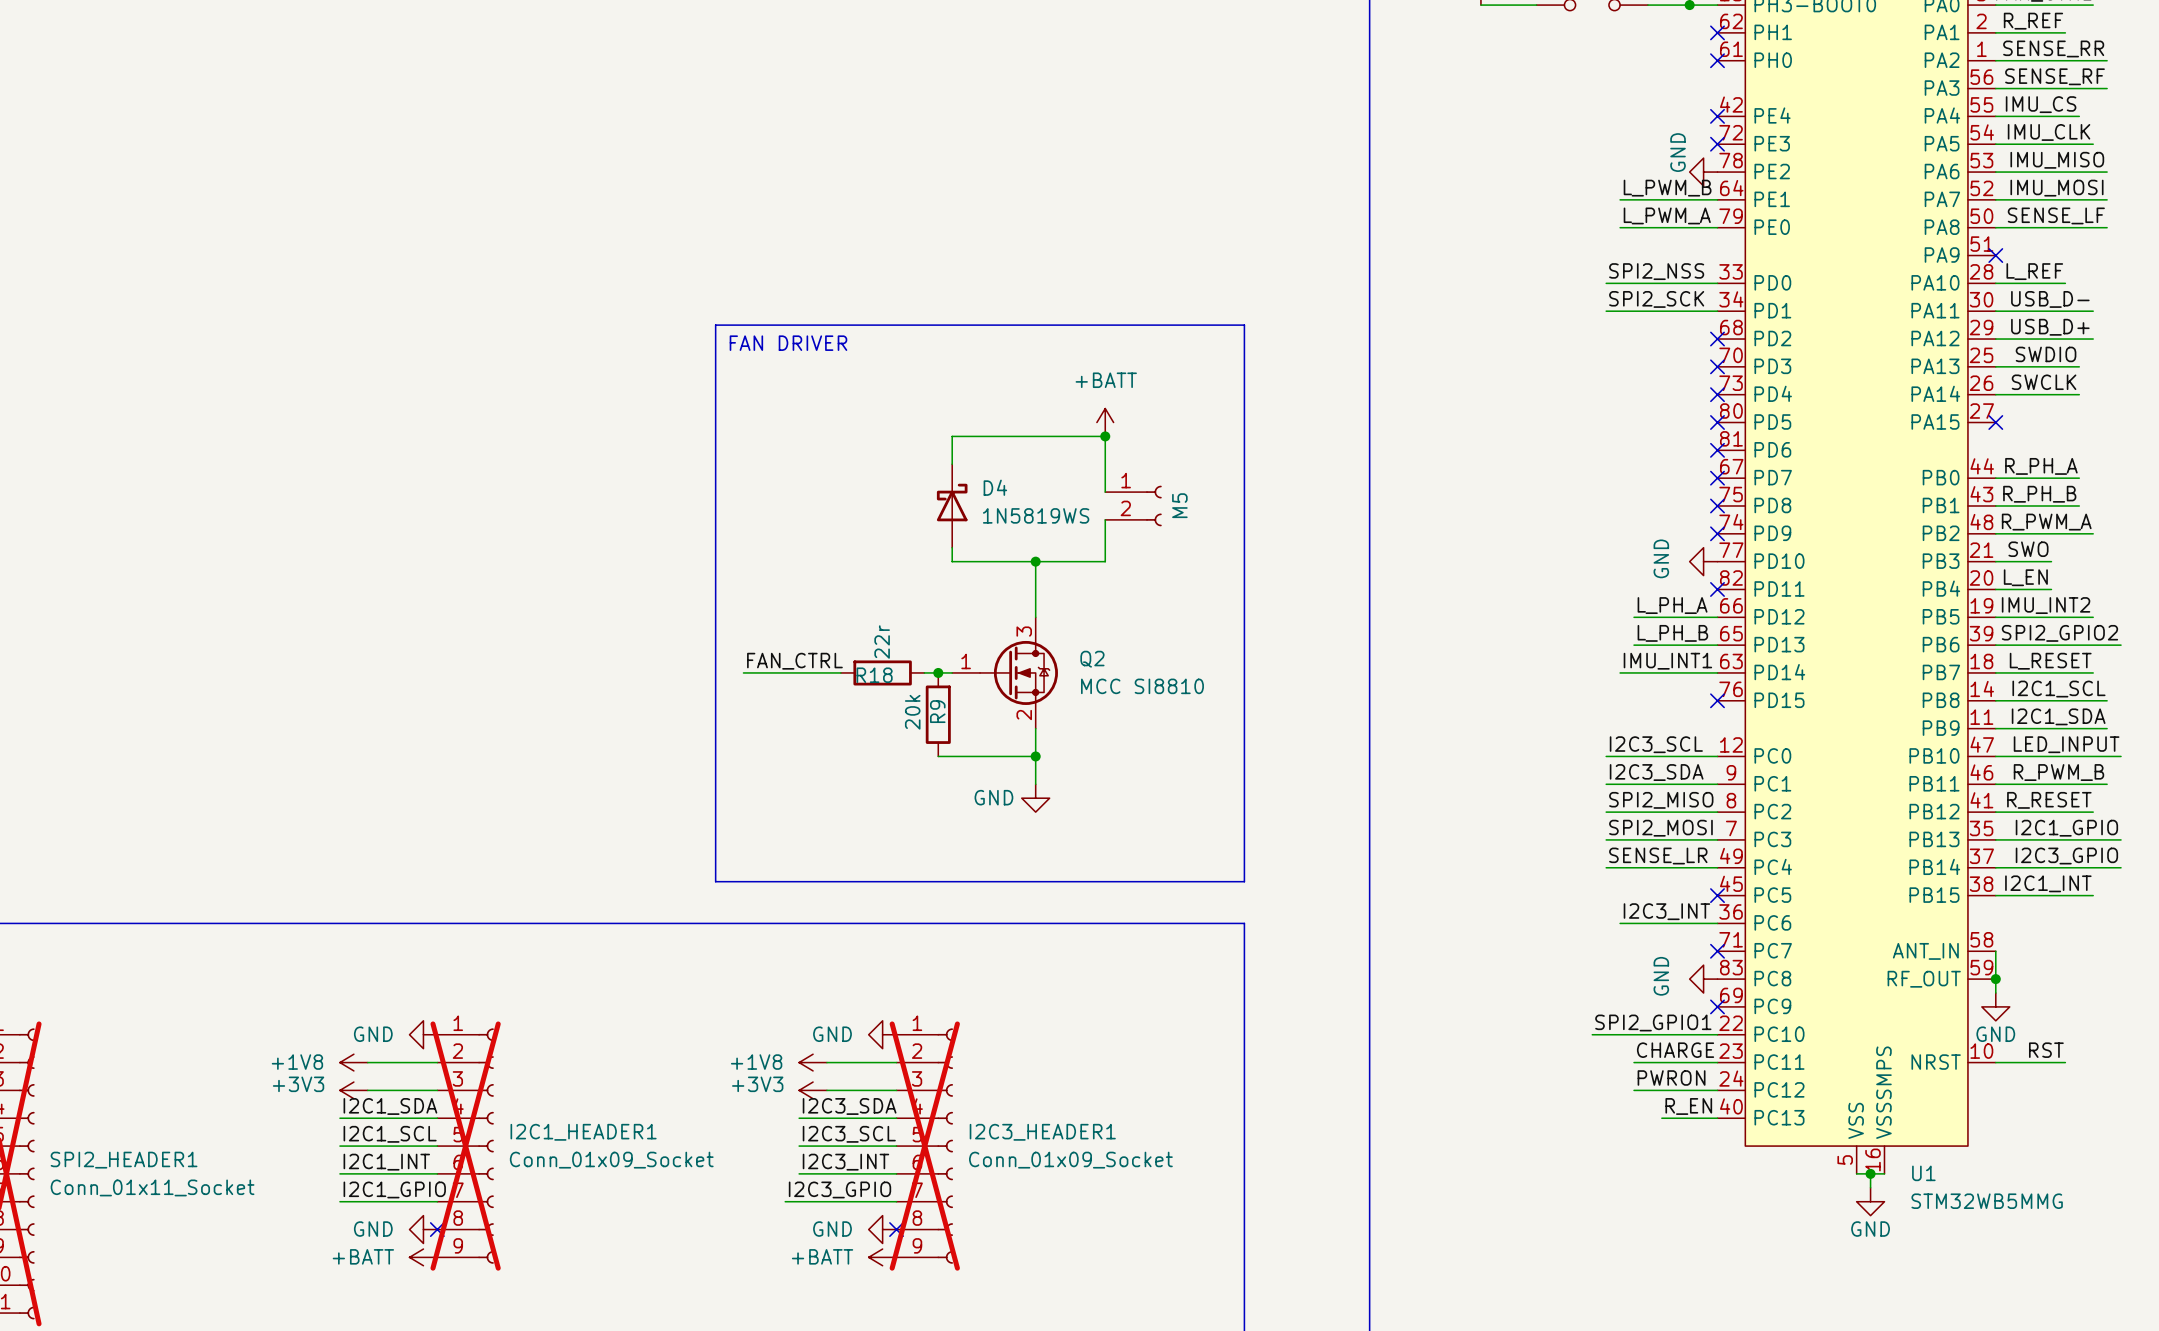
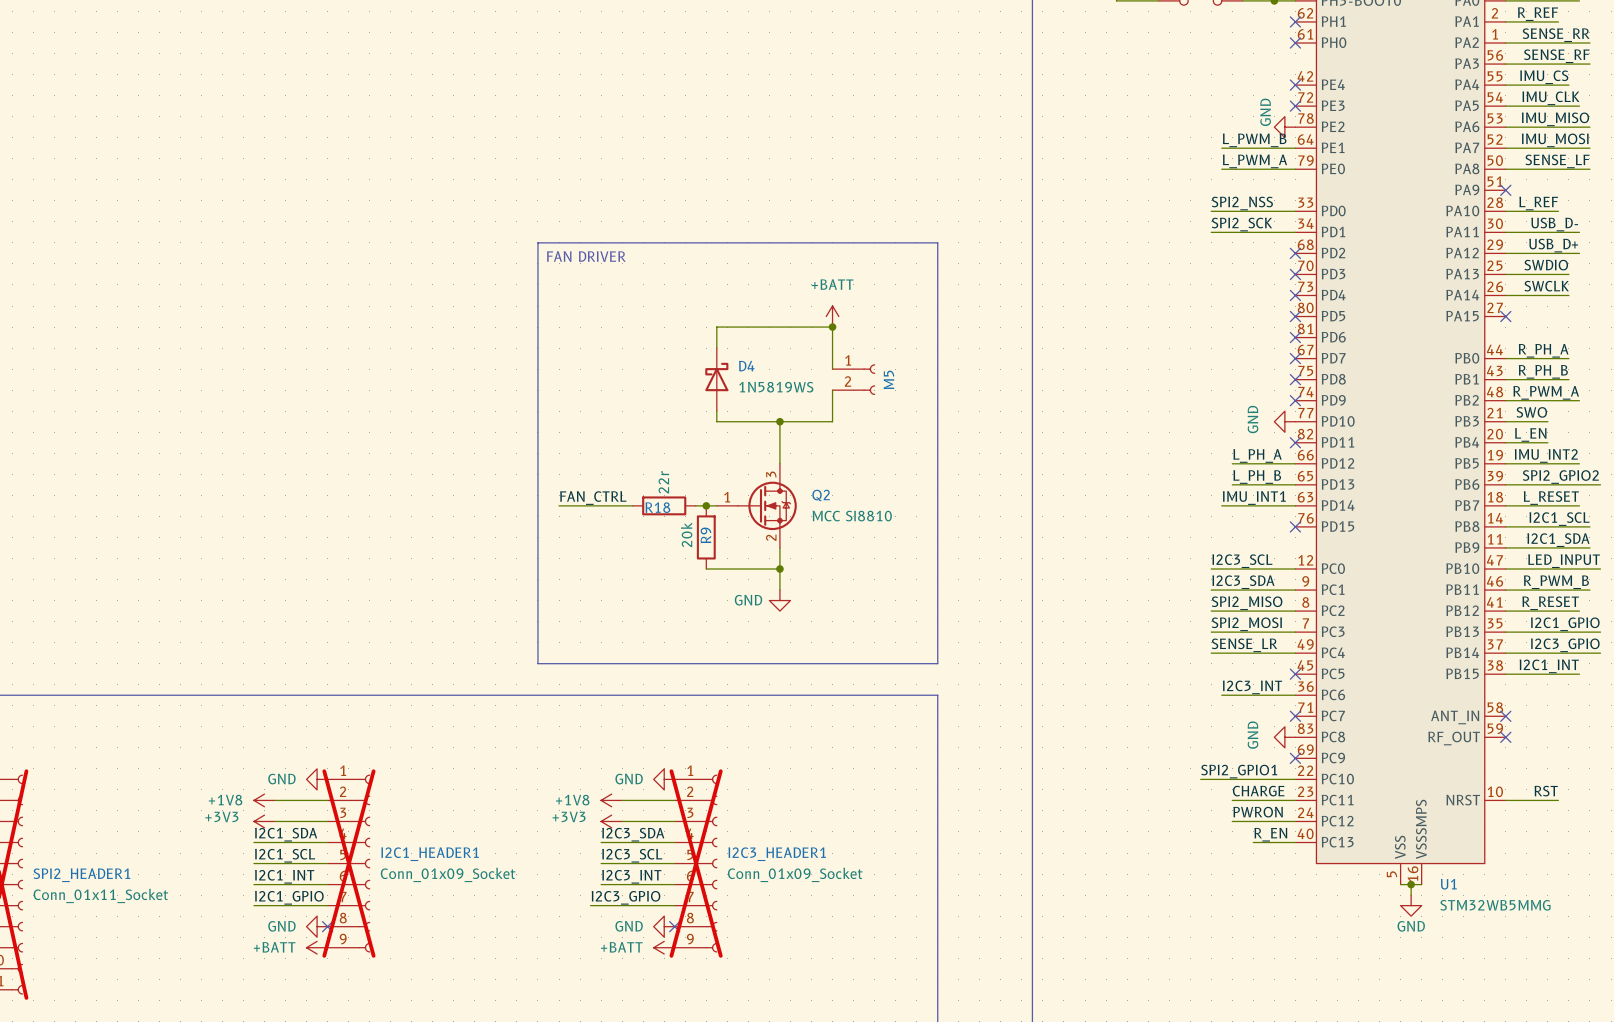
wire: (1995, 951) (1995, 993) -> none
no-connect mark: none -> (1505, 716)
junction: (1995, 979) -> none
no-connect mark: none -> (1505, 737)
power symbol: GND (1995, 1006) -> none

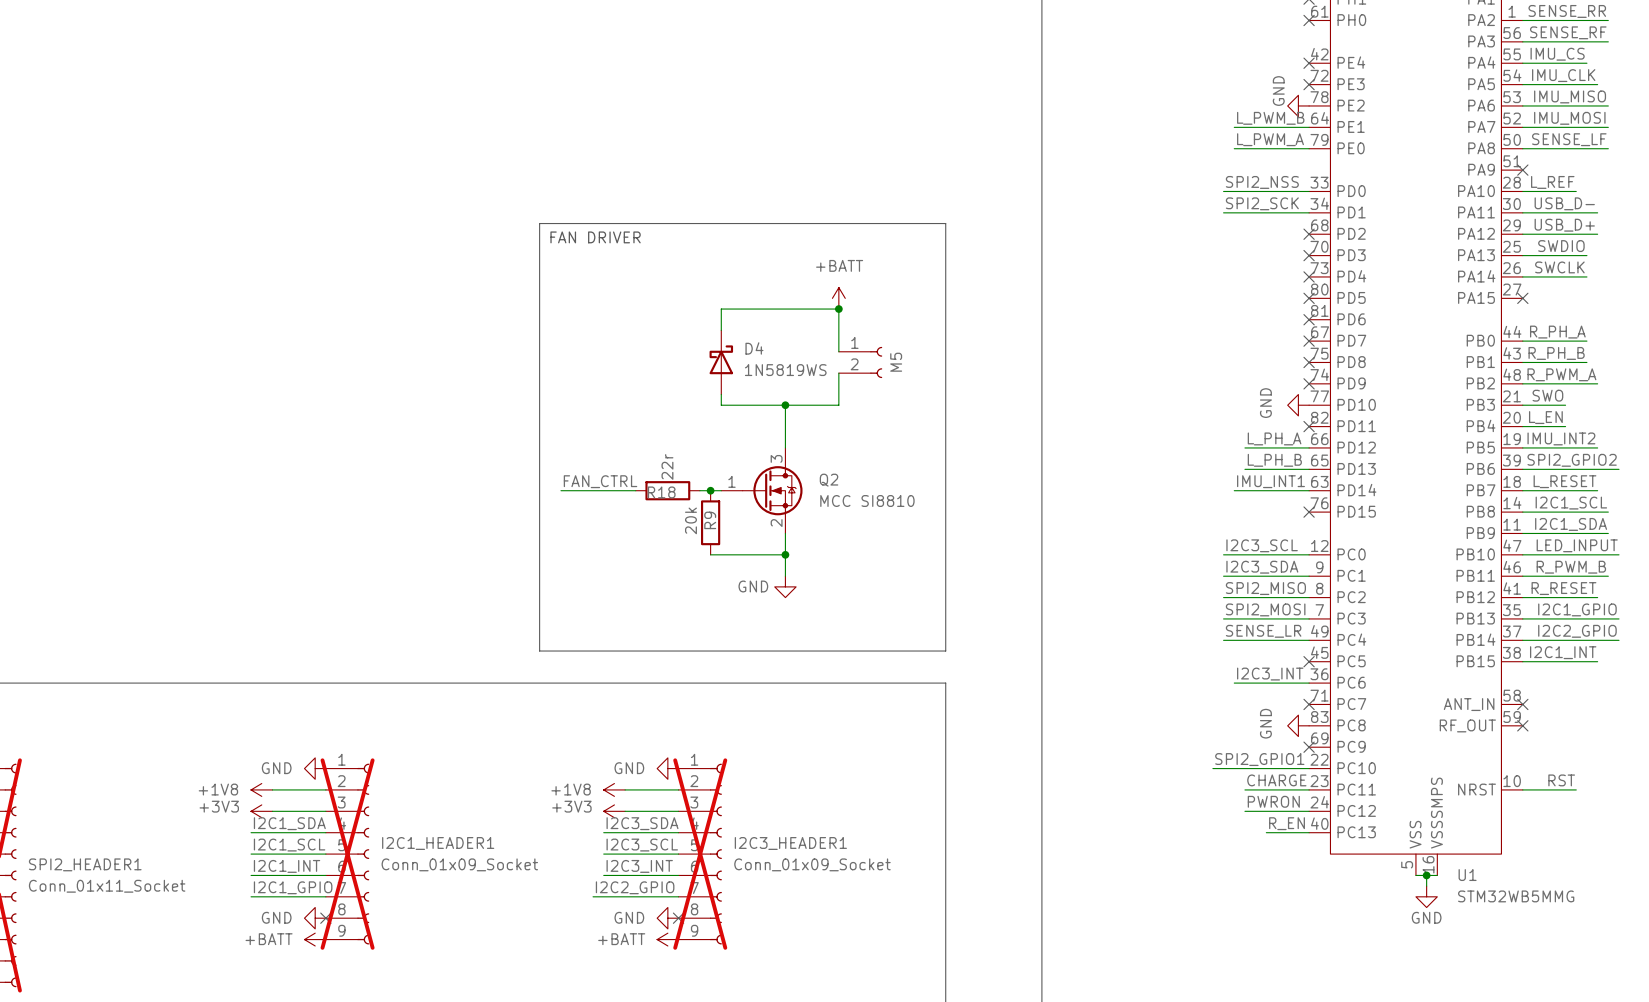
label: I2C3_GPIO (1565, 645) -> I2C2_GPIO (1577, 631)
label: I2C3_GPIO (626, 897) -> I2C2_GPIO (635, 887)

